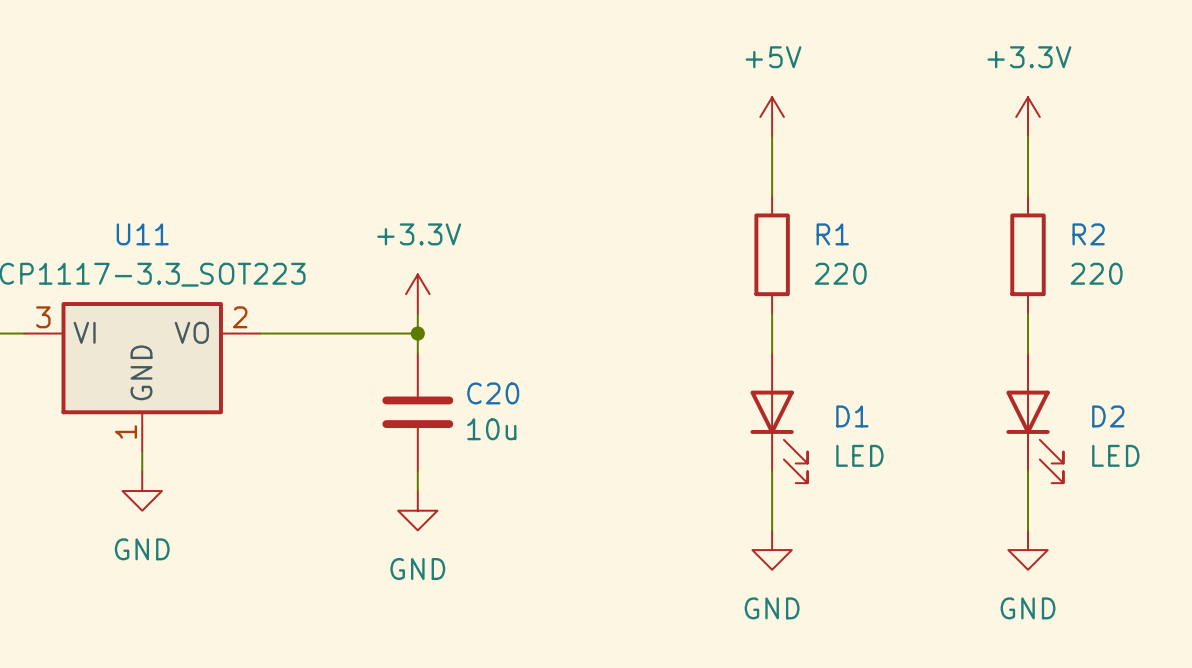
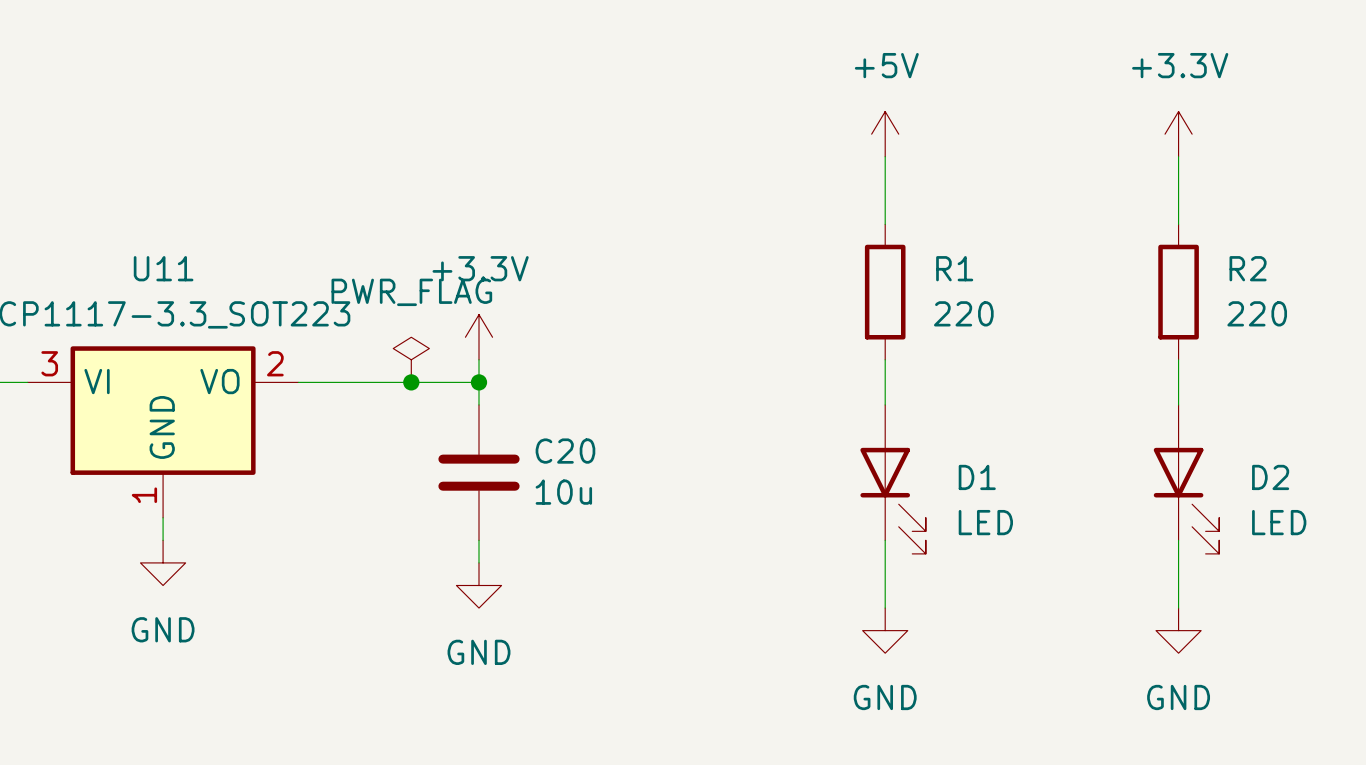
power symbol: none -> PWR_FLAG (411, 359)
junction: none -> (411, 382)

